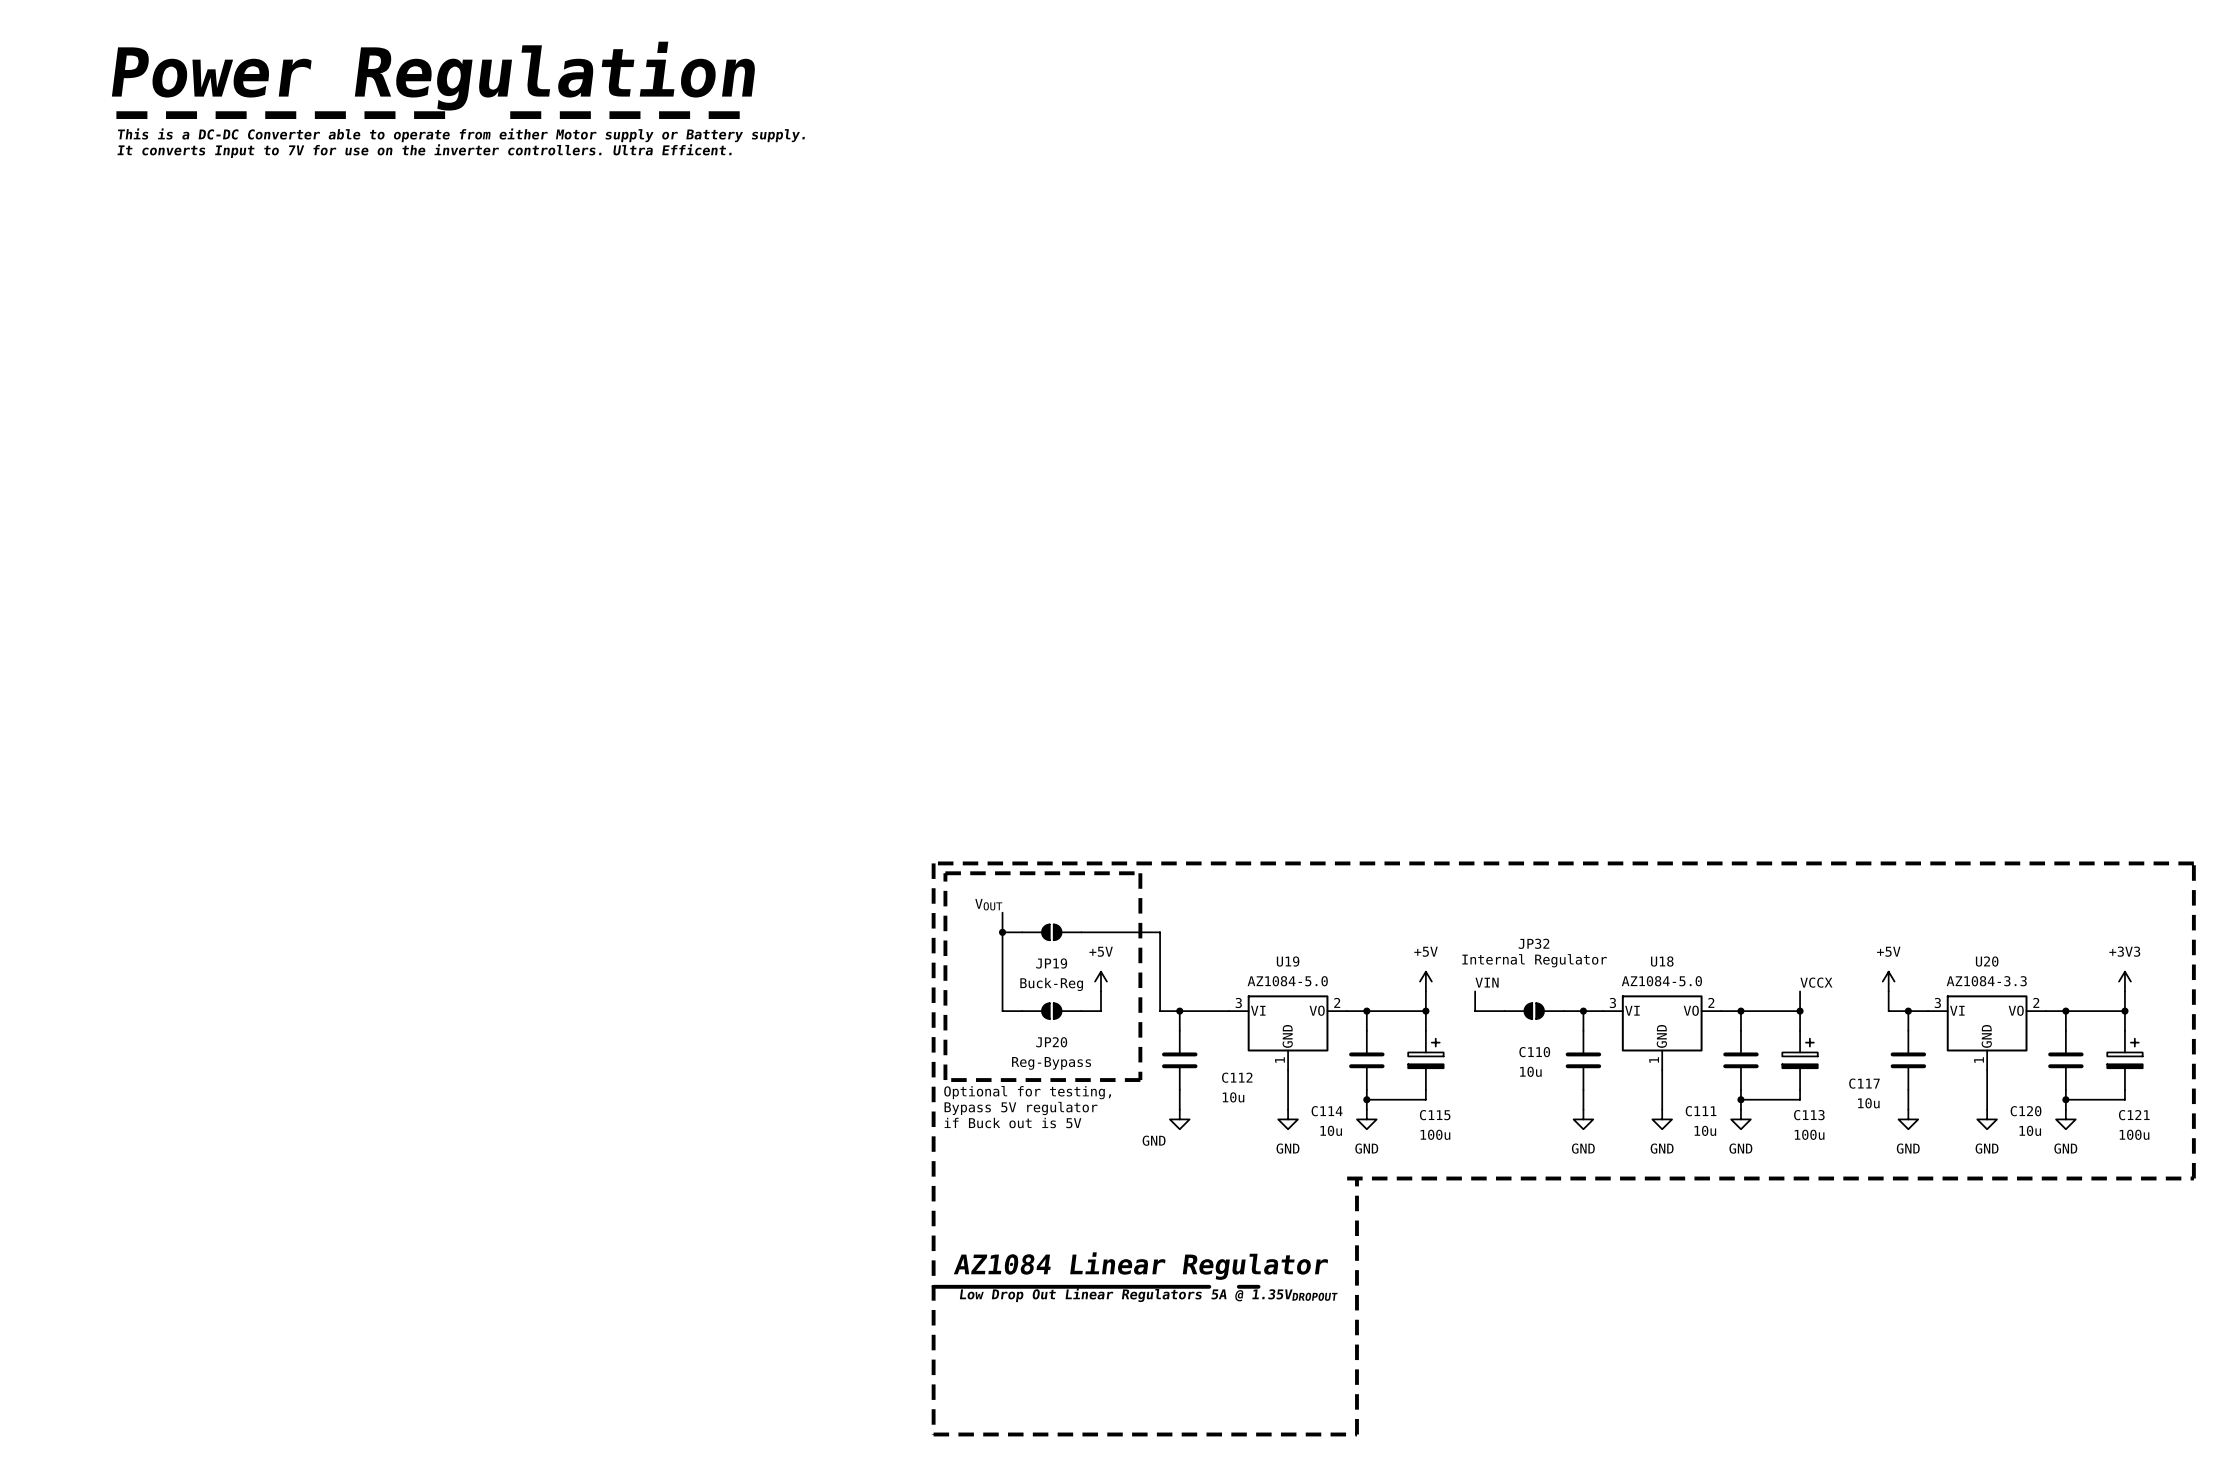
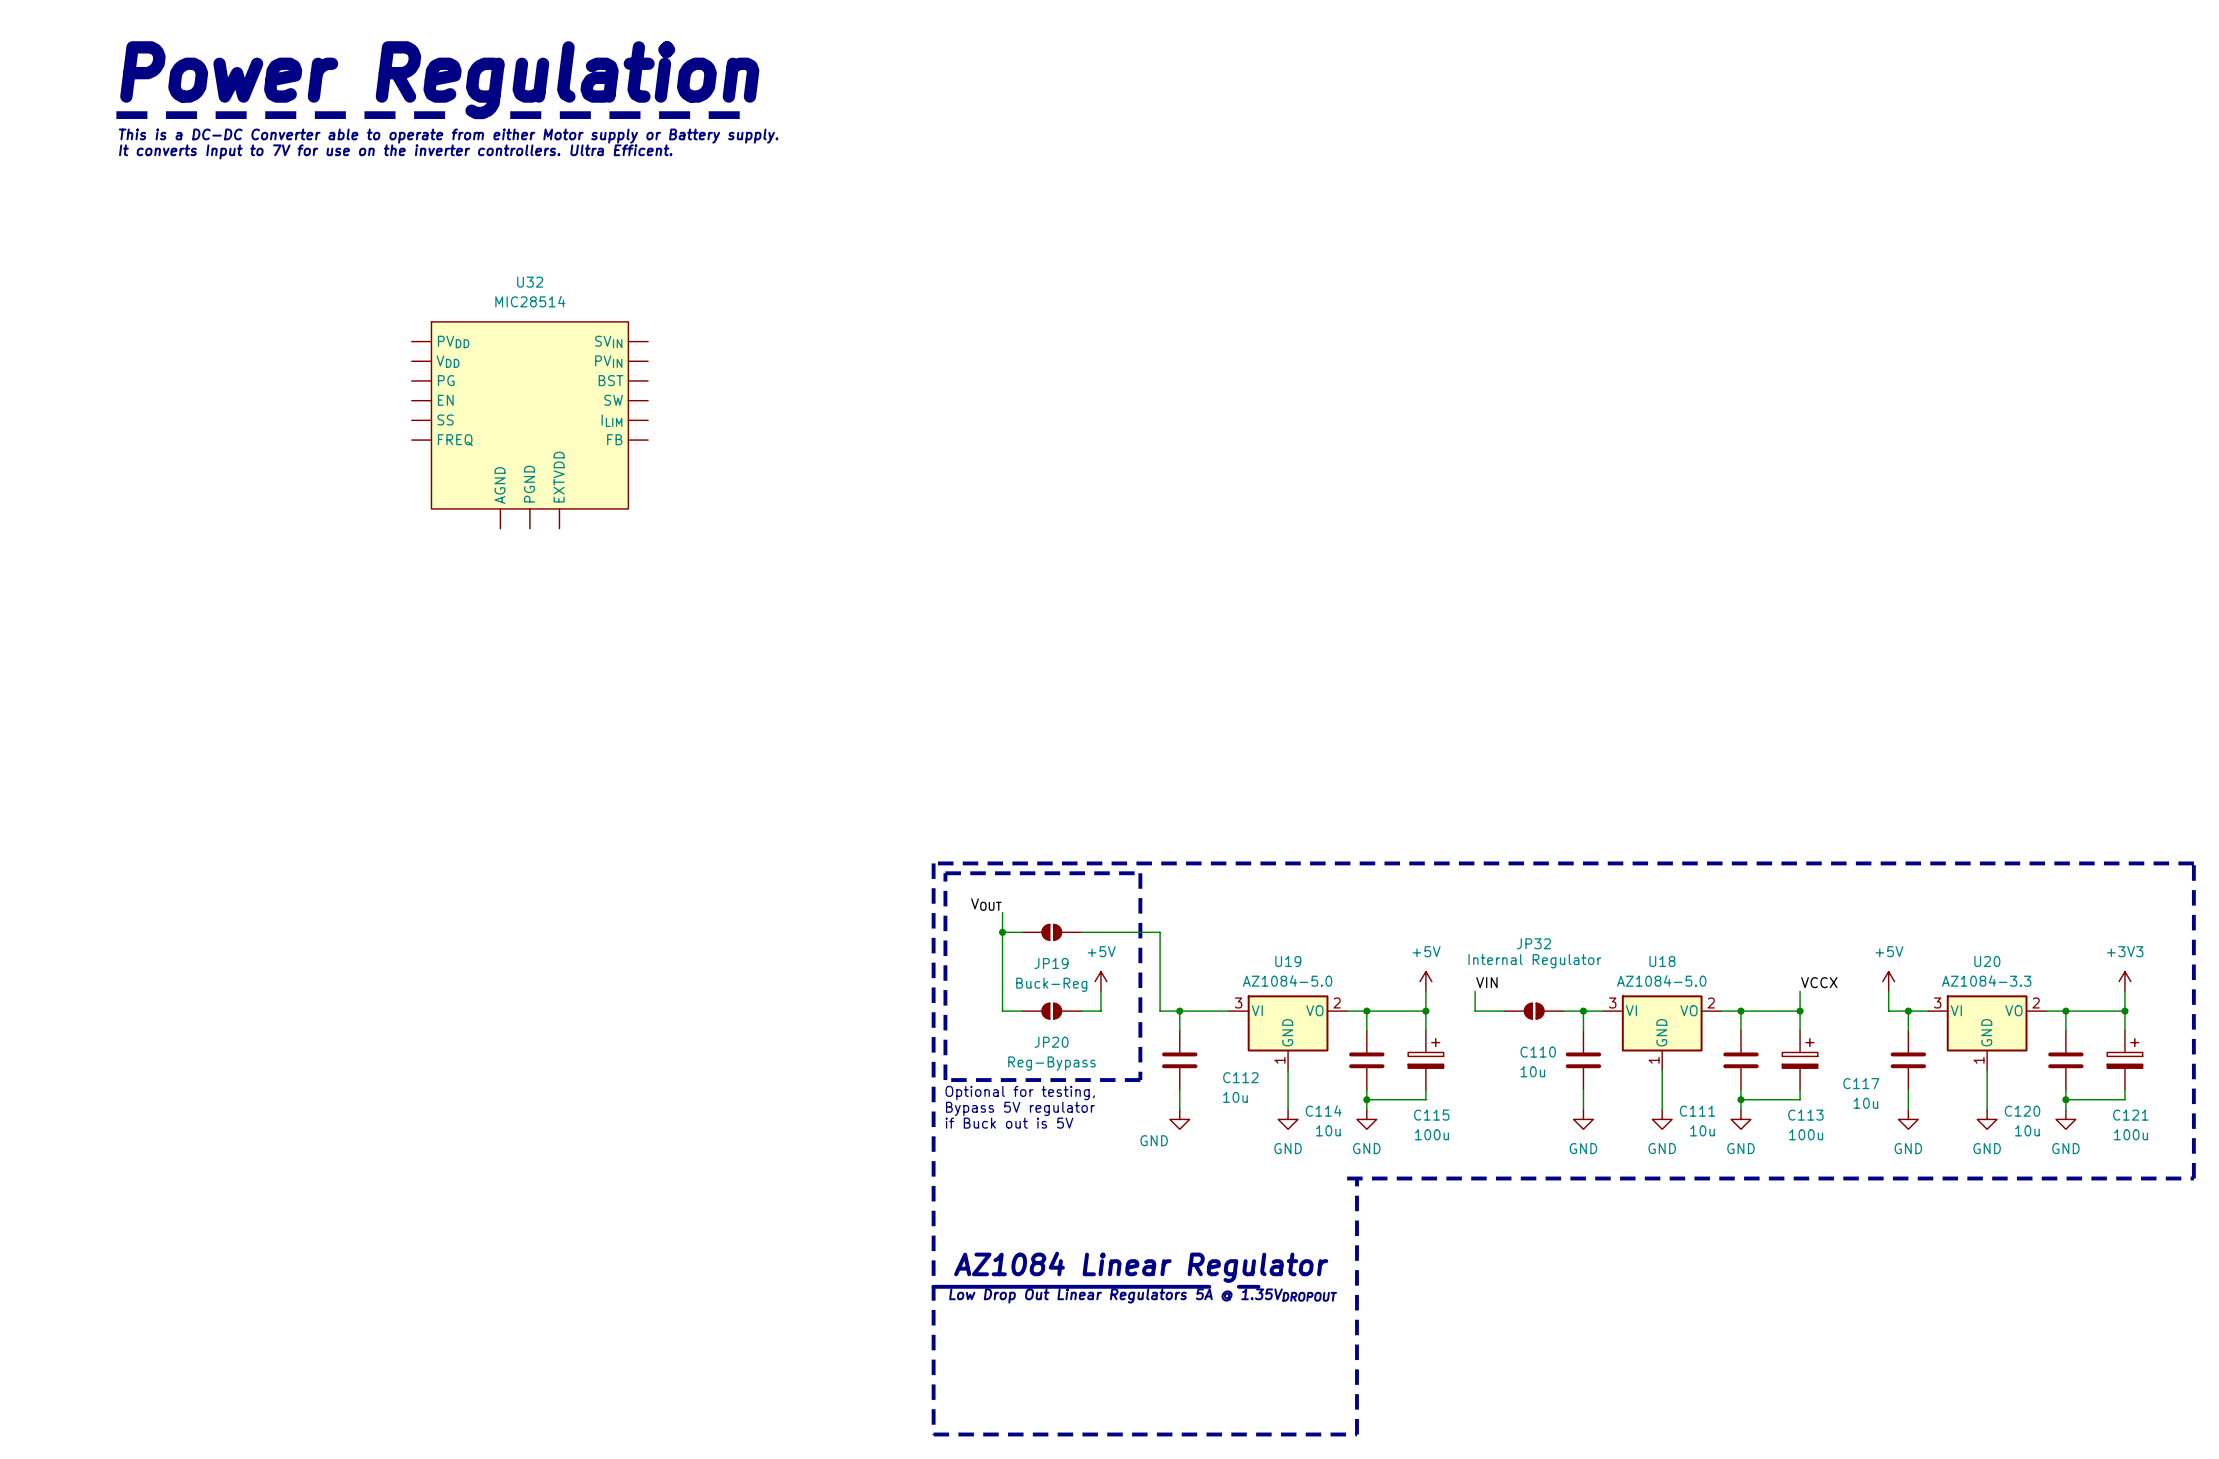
U32: none -> MIC28514 (529, 425)

